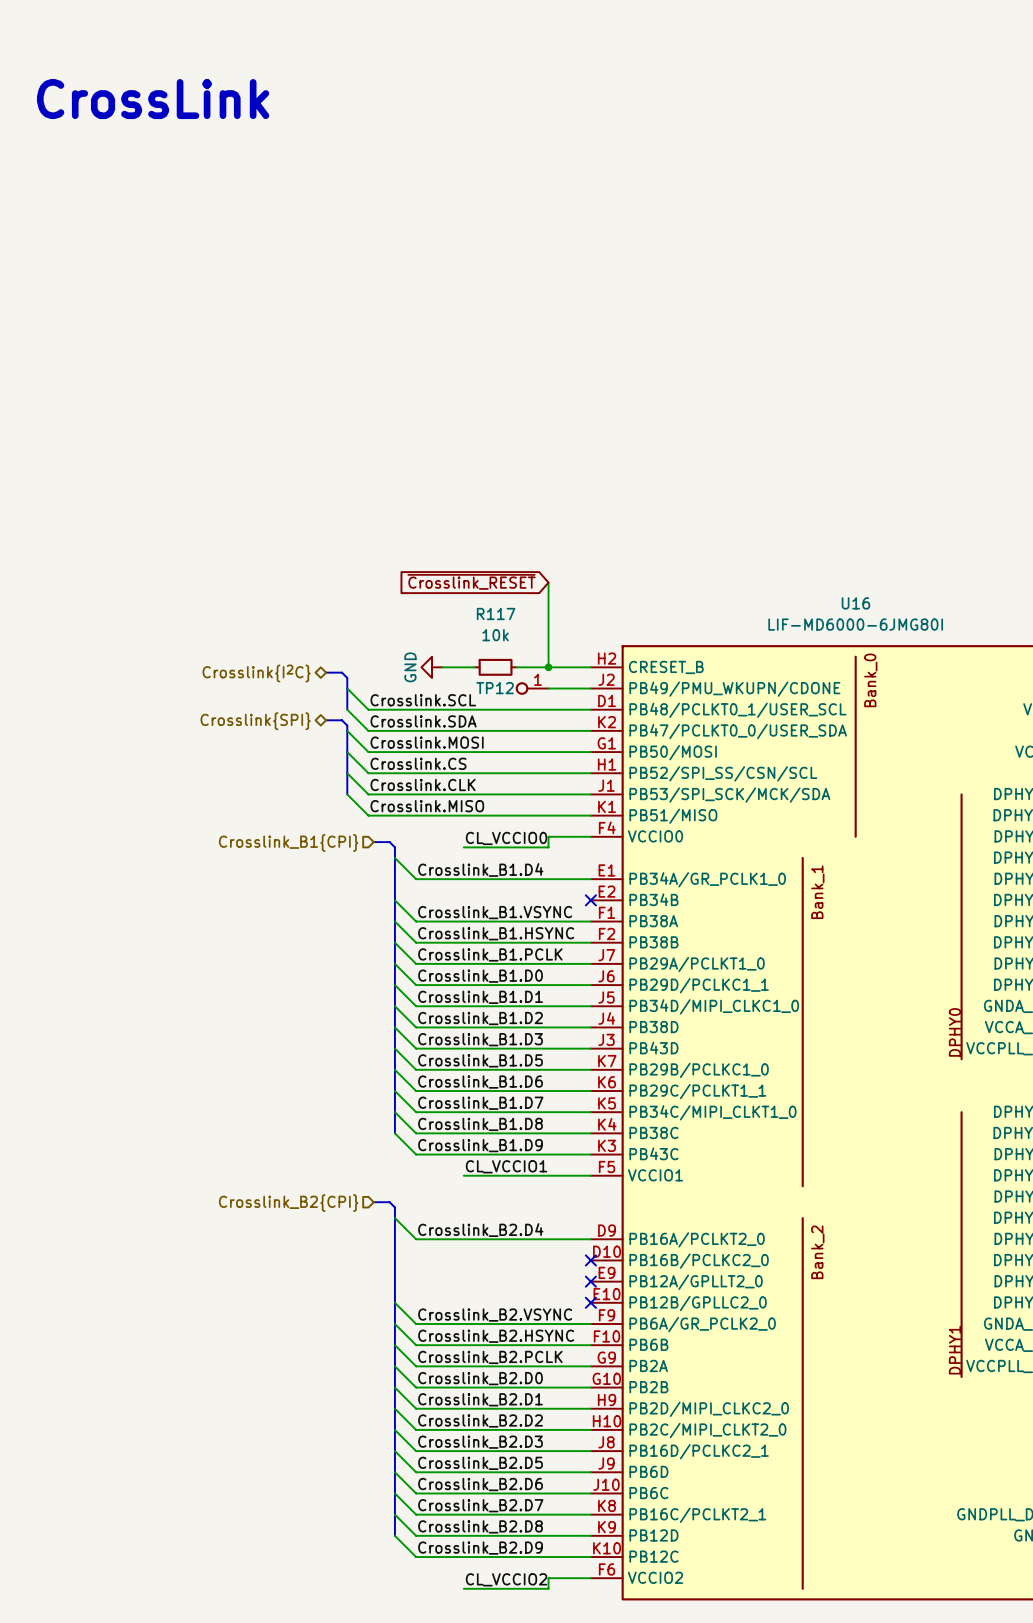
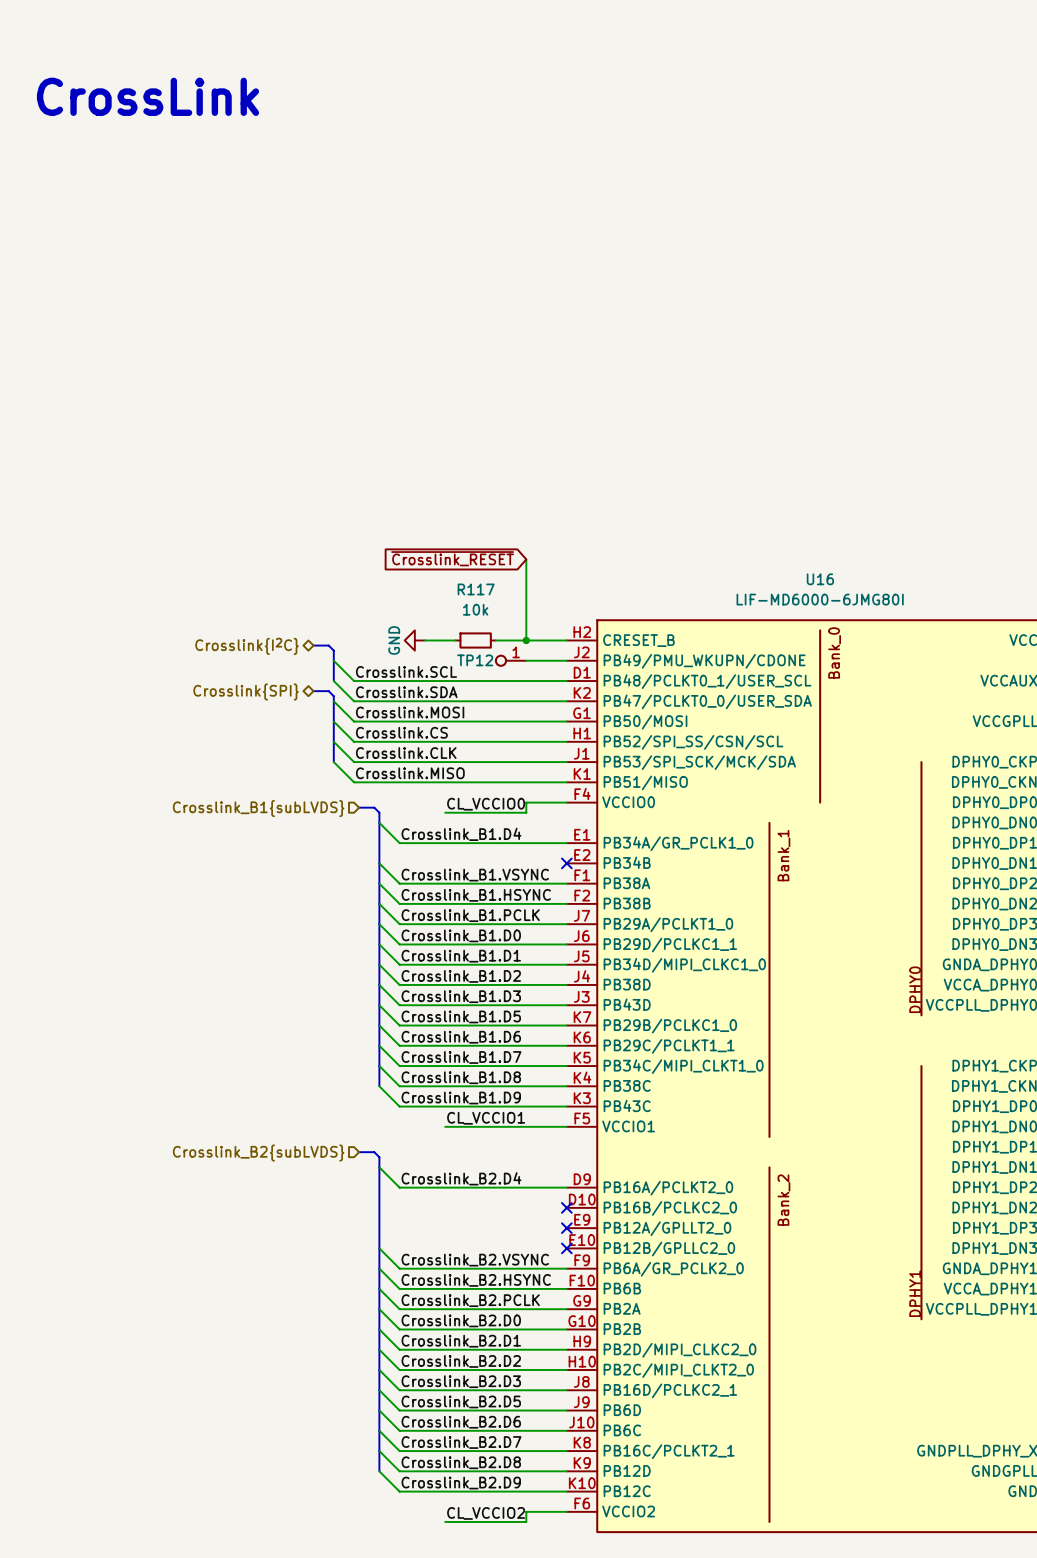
hierarchical label: Crosslink_B1{CPI} (288, 842) -> Crosslink_B1{subLVDS} (258, 808)
hierarchical label: Crosslink_B2{CPI} (288, 1203) -> Crosslink_B2{subLVDS} (258, 1152)

